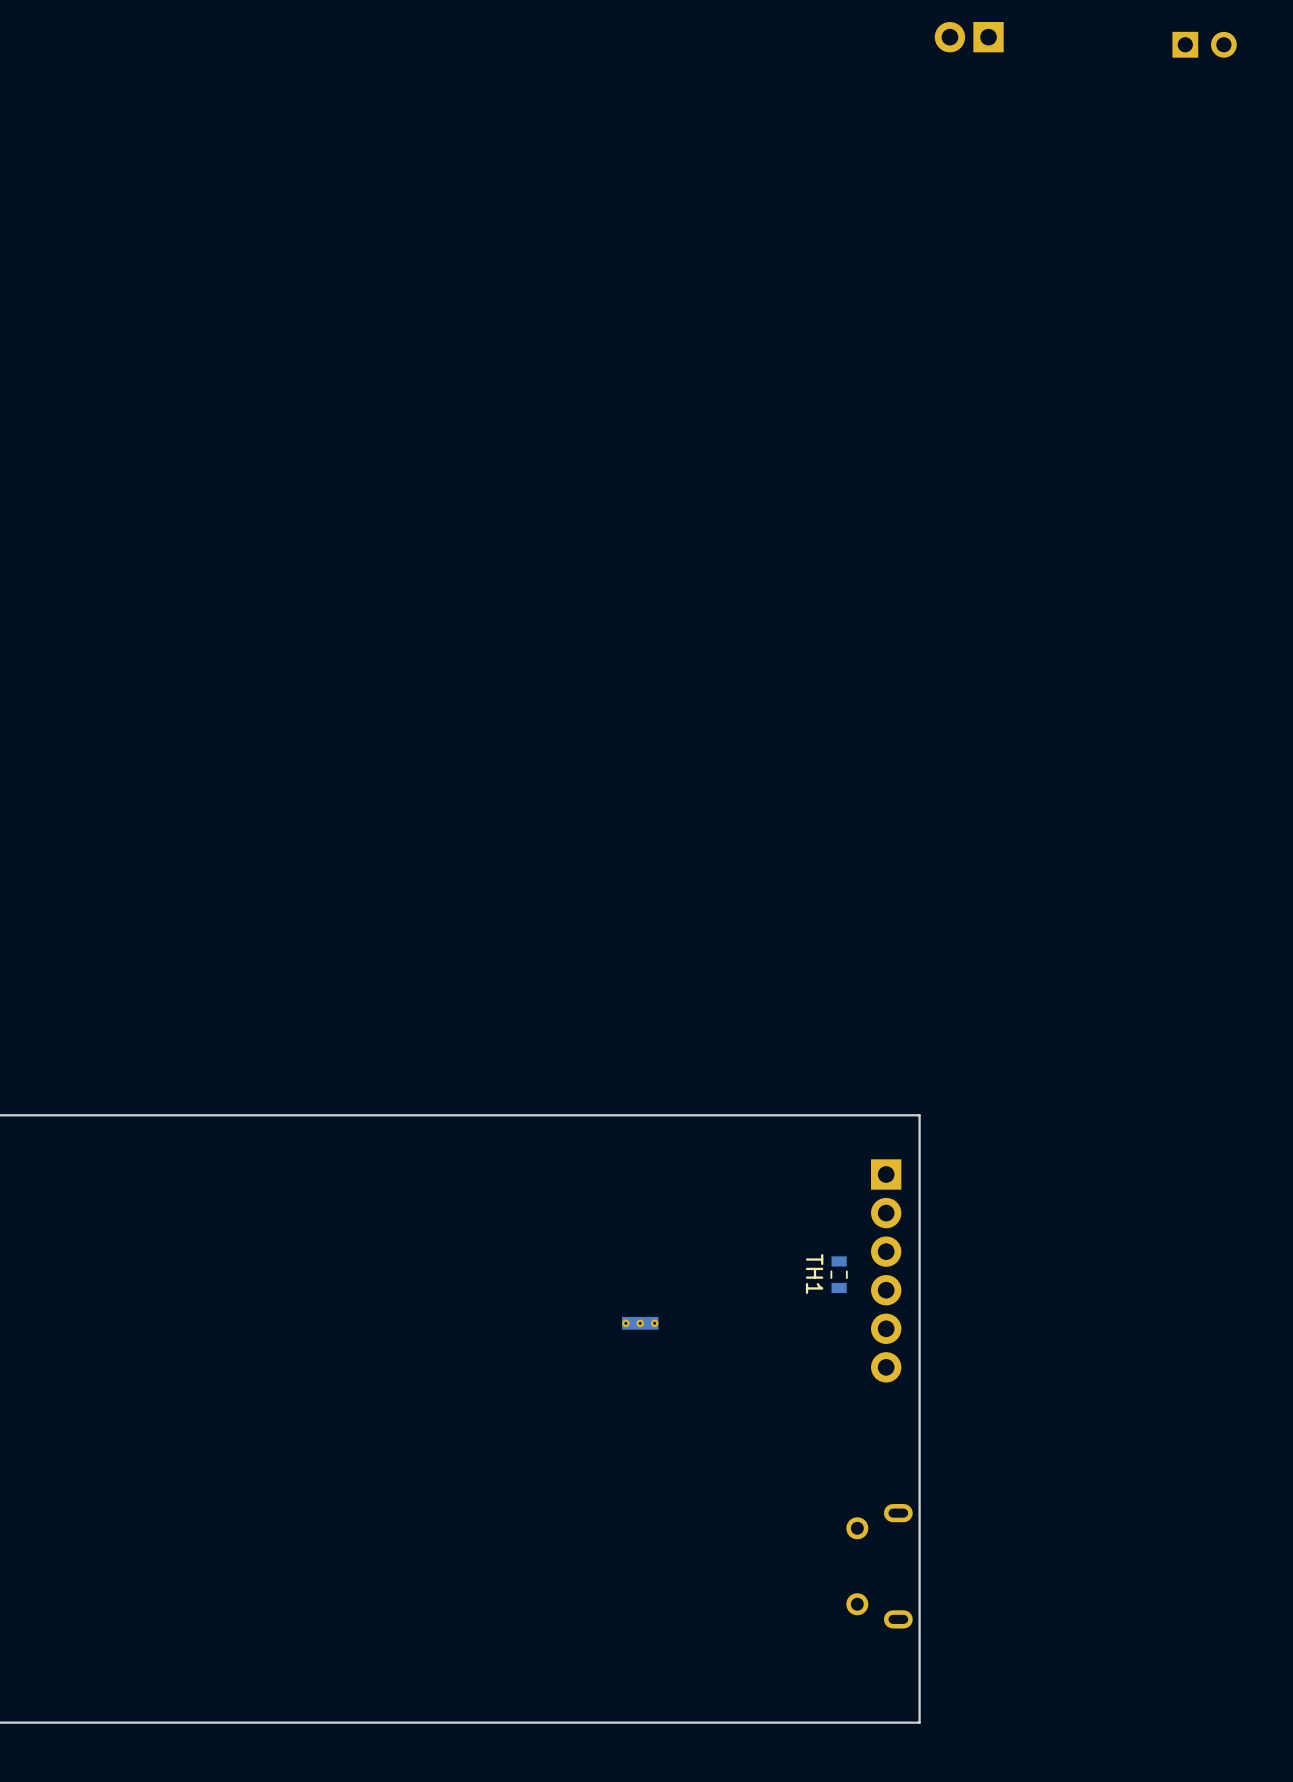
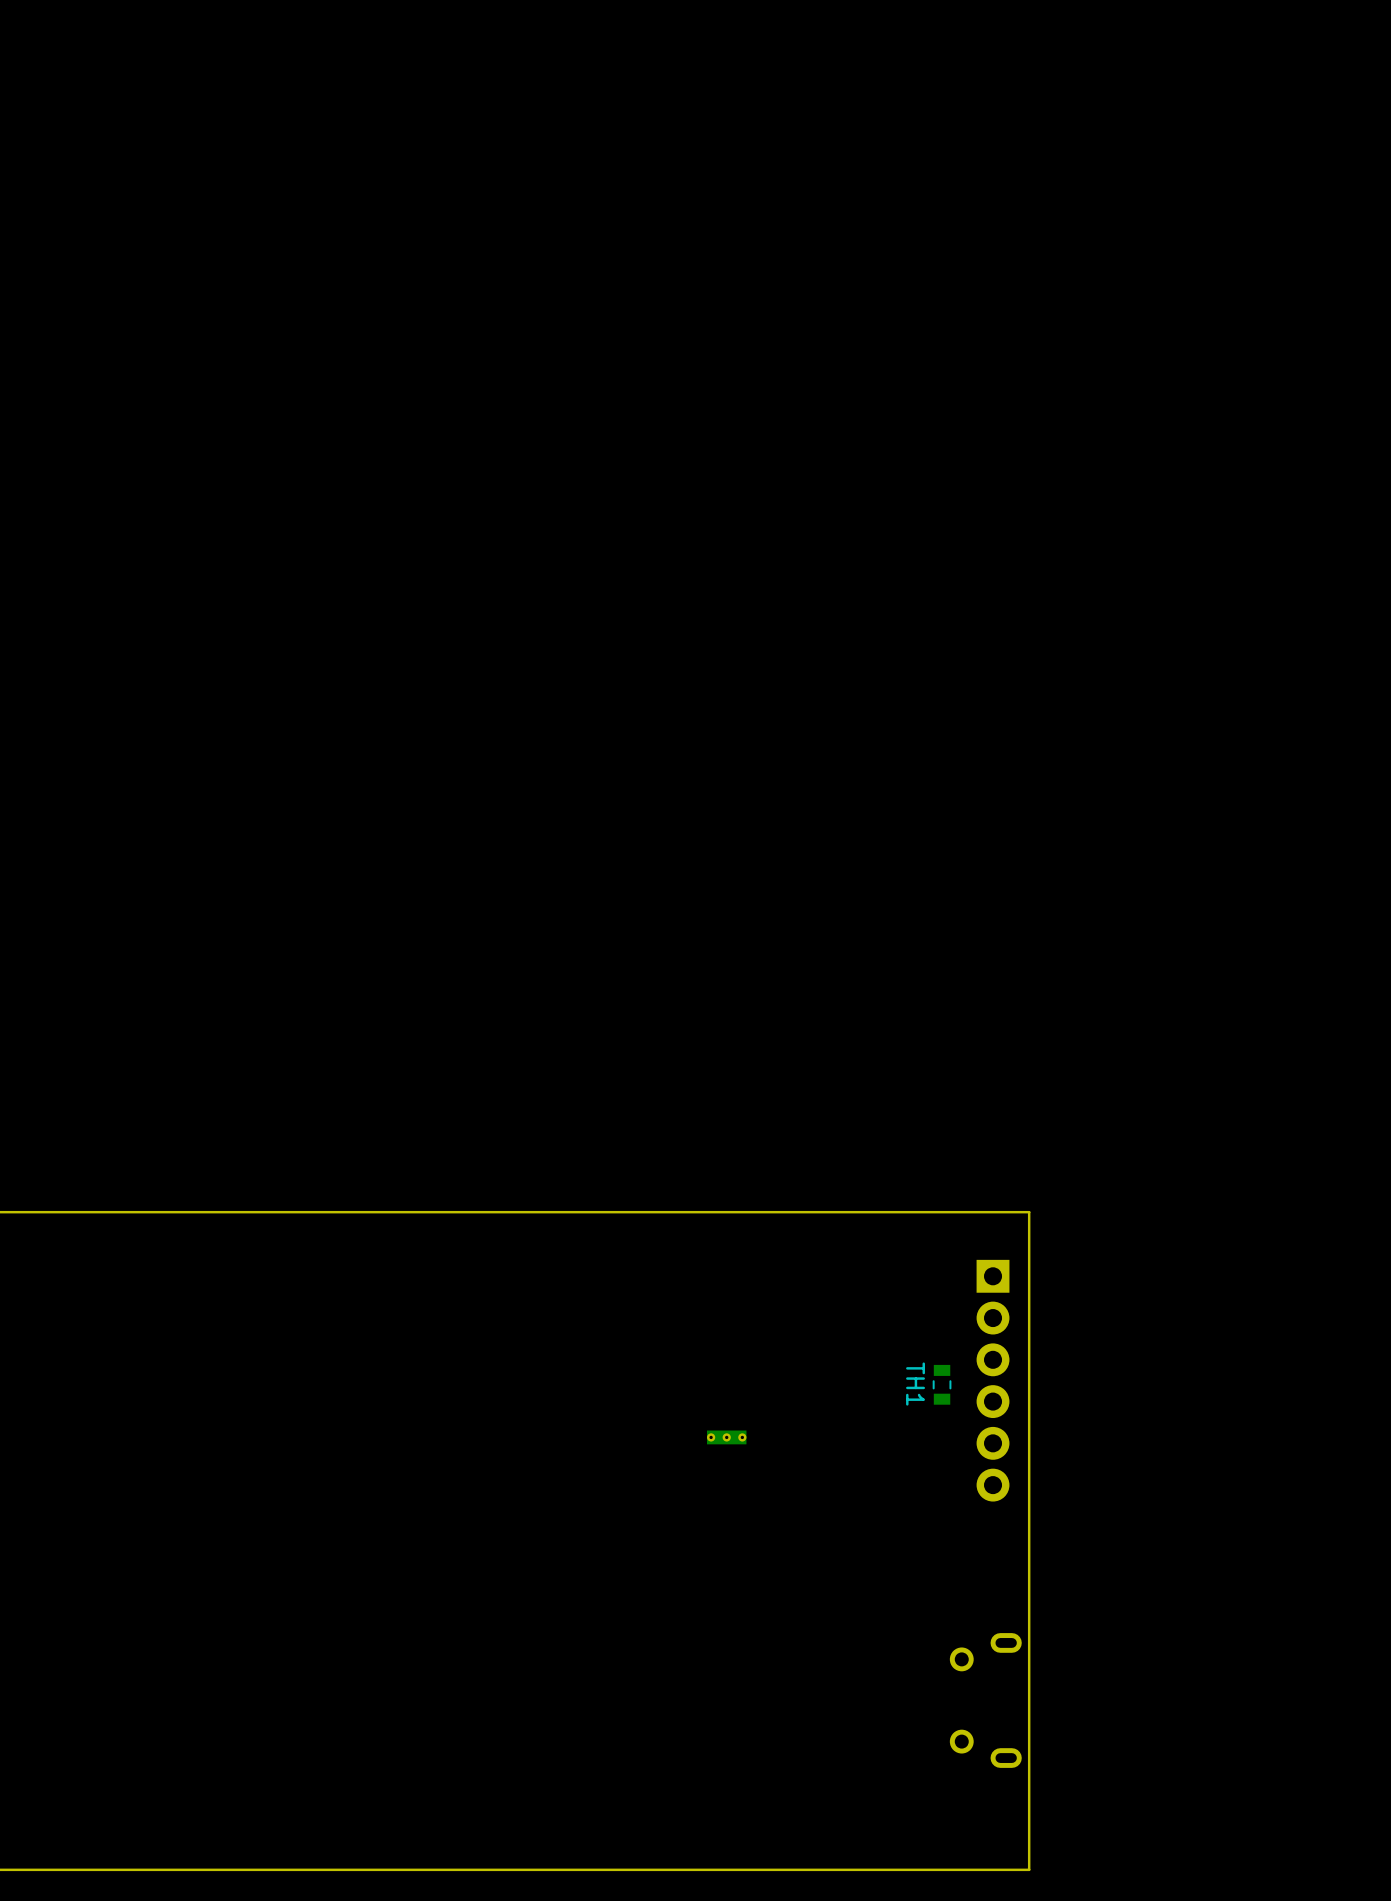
part: (969, 37) -> none
part: (1204, 44) -> none

